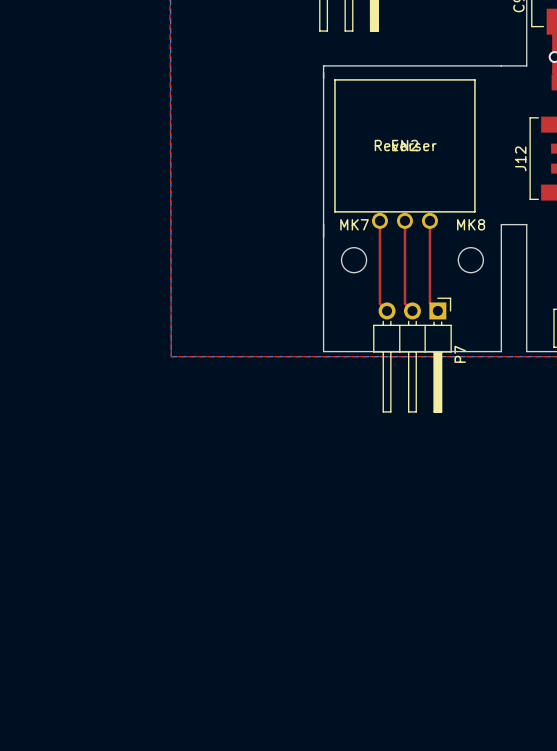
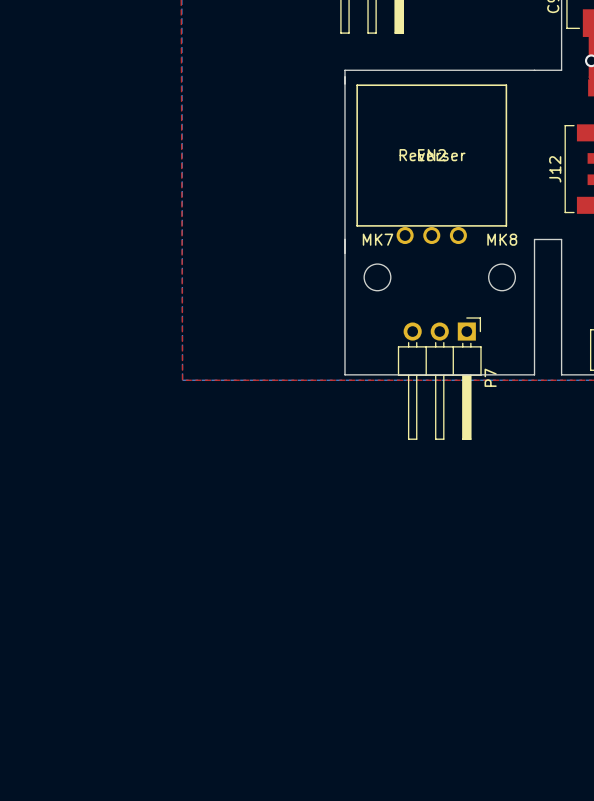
top track: (379, 220) (379, 303) (387, 310) -> none
top track: (404, 220) (404, 303) (412, 310) -> none
top track: (429, 220) (429, 303) (437, 310) -> none

